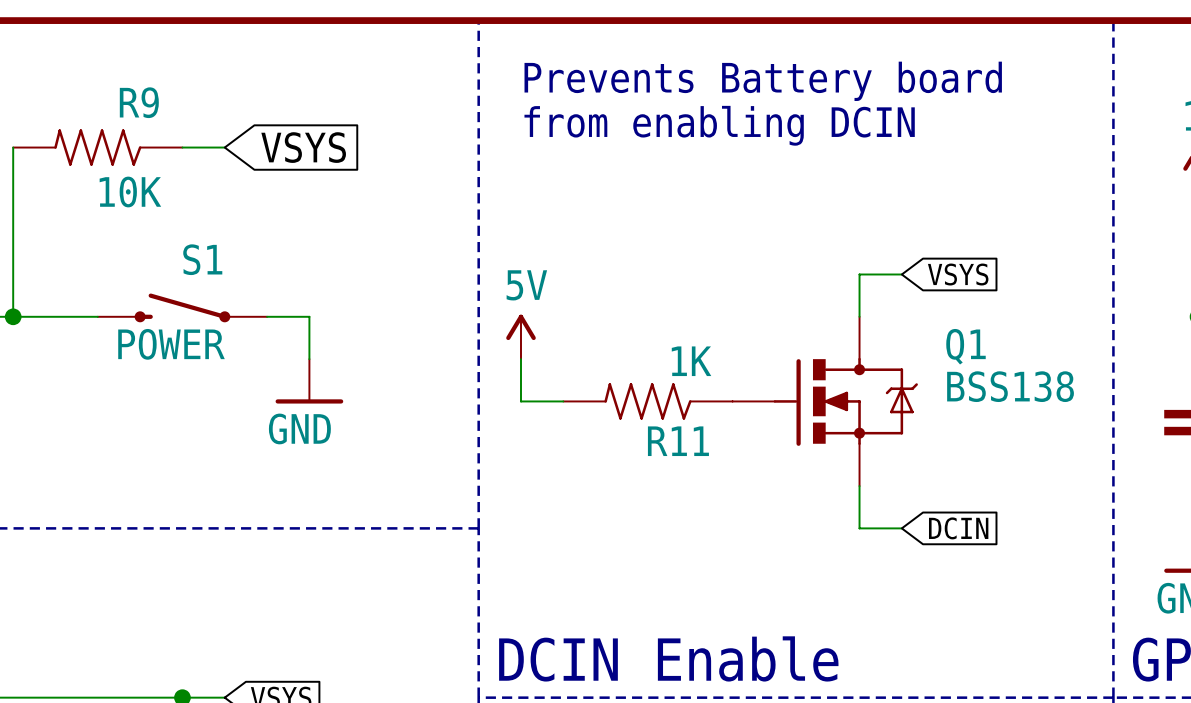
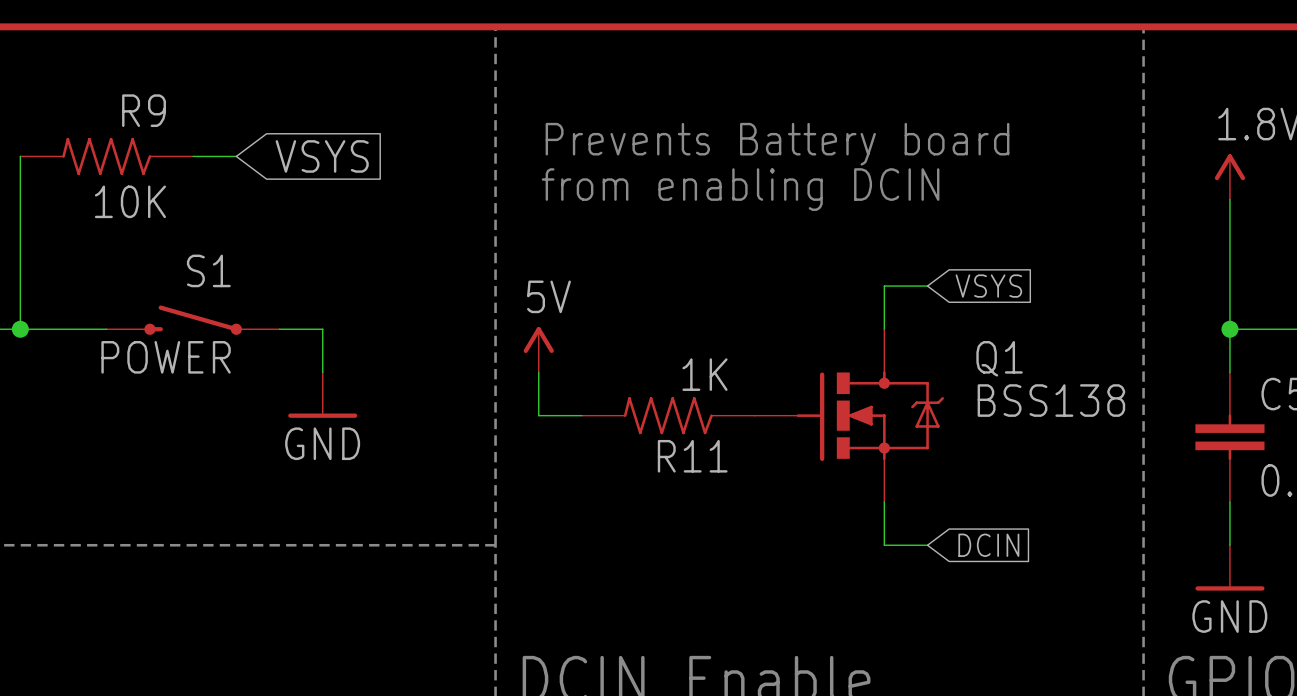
text position: Prevents Battery board (763, 81) -> Prevents Battery board (777, 144)
text position: from enabling DCIN (719, 125) -> from enabling DCIN (740, 189)

